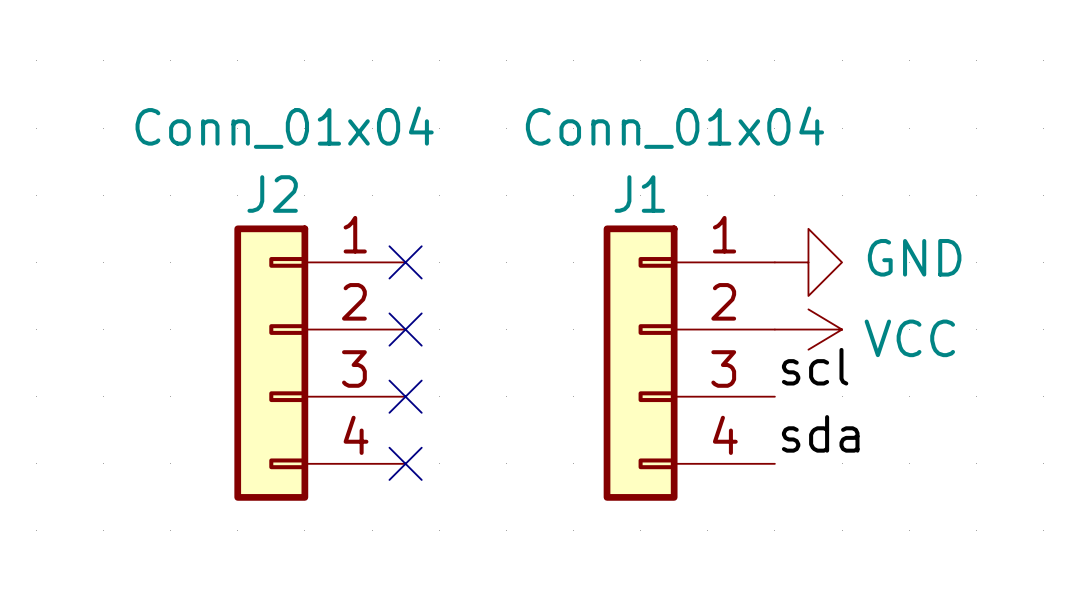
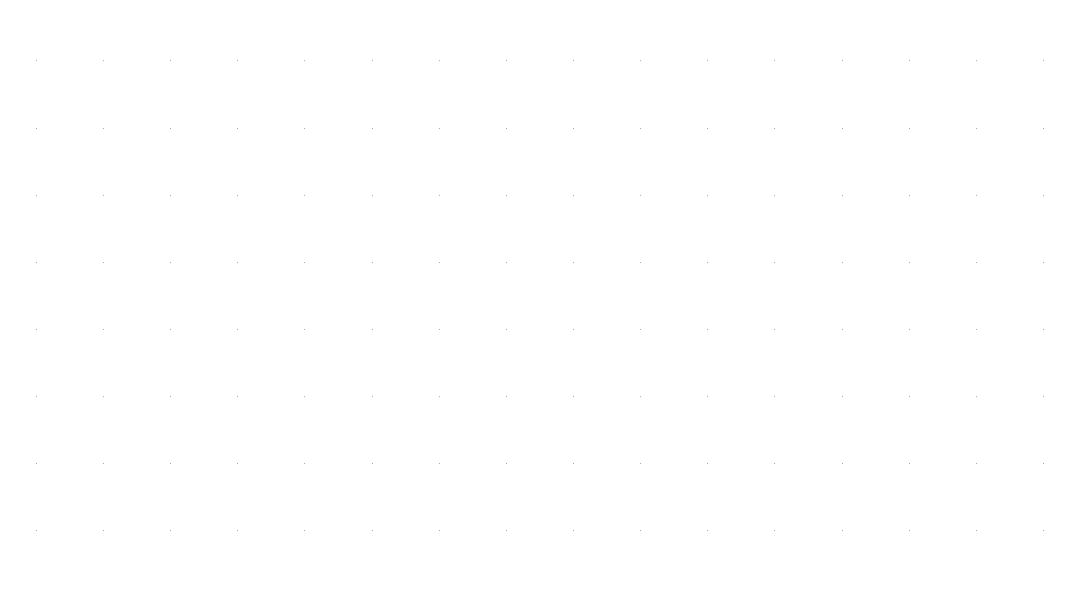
no-connect mark: (405, 262) -> none
power symbol: GND (808, 262) -> none
no-connect mark: (405, 329) -> none
power symbol: VCC (808, 329) -> none
J2: Conn_01x04 (319, 363) -> none
J1: Conn_01x04 (689, 363) -> none
label: scl (815, 366) -> none
no-connect mark: (405, 396) -> none
label: sda (820, 433) -> none
no-connect mark: (405, 463) -> none

